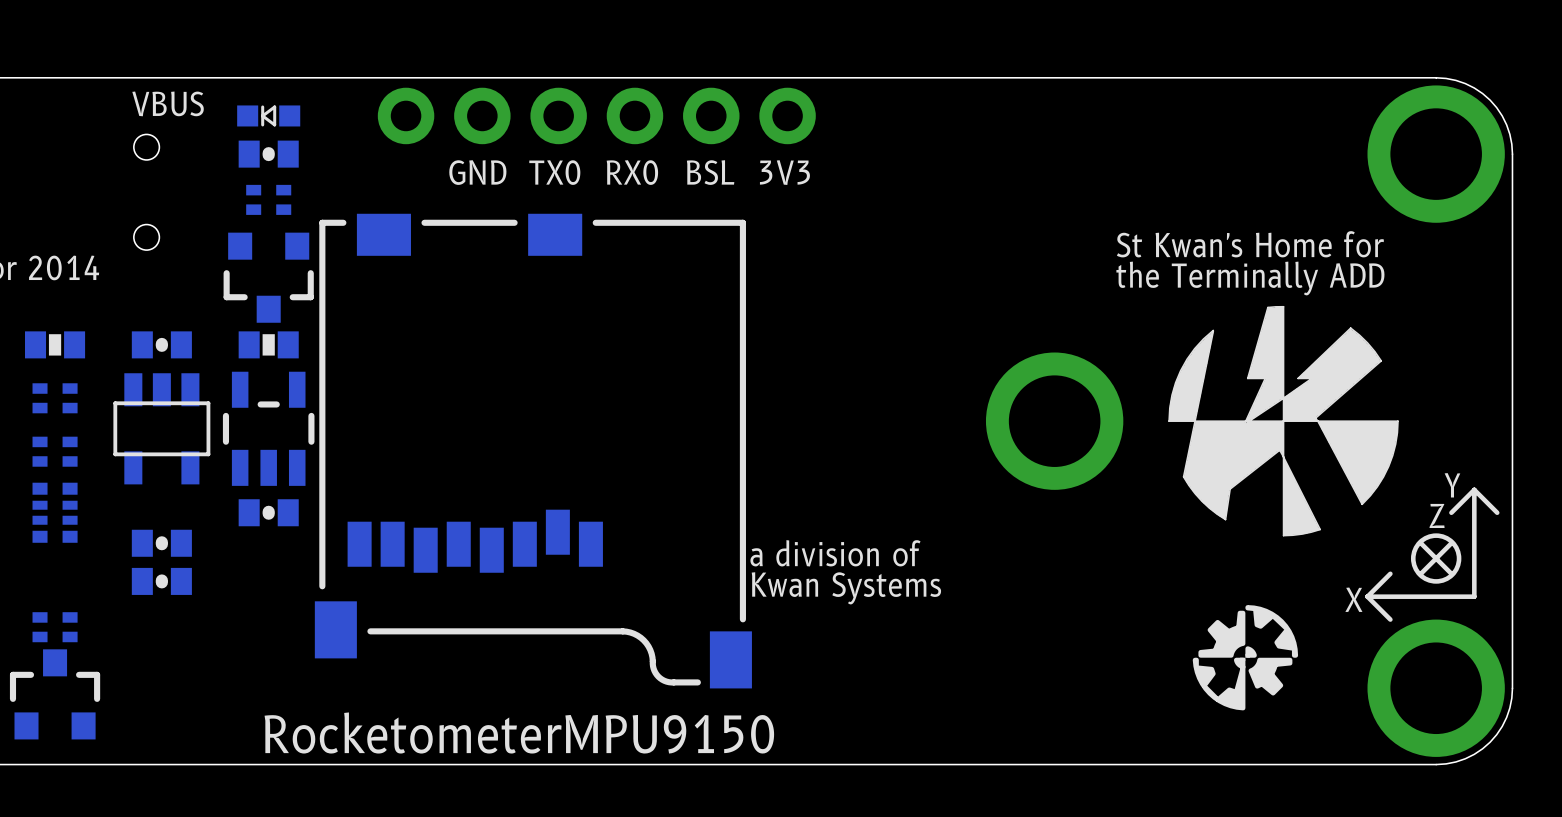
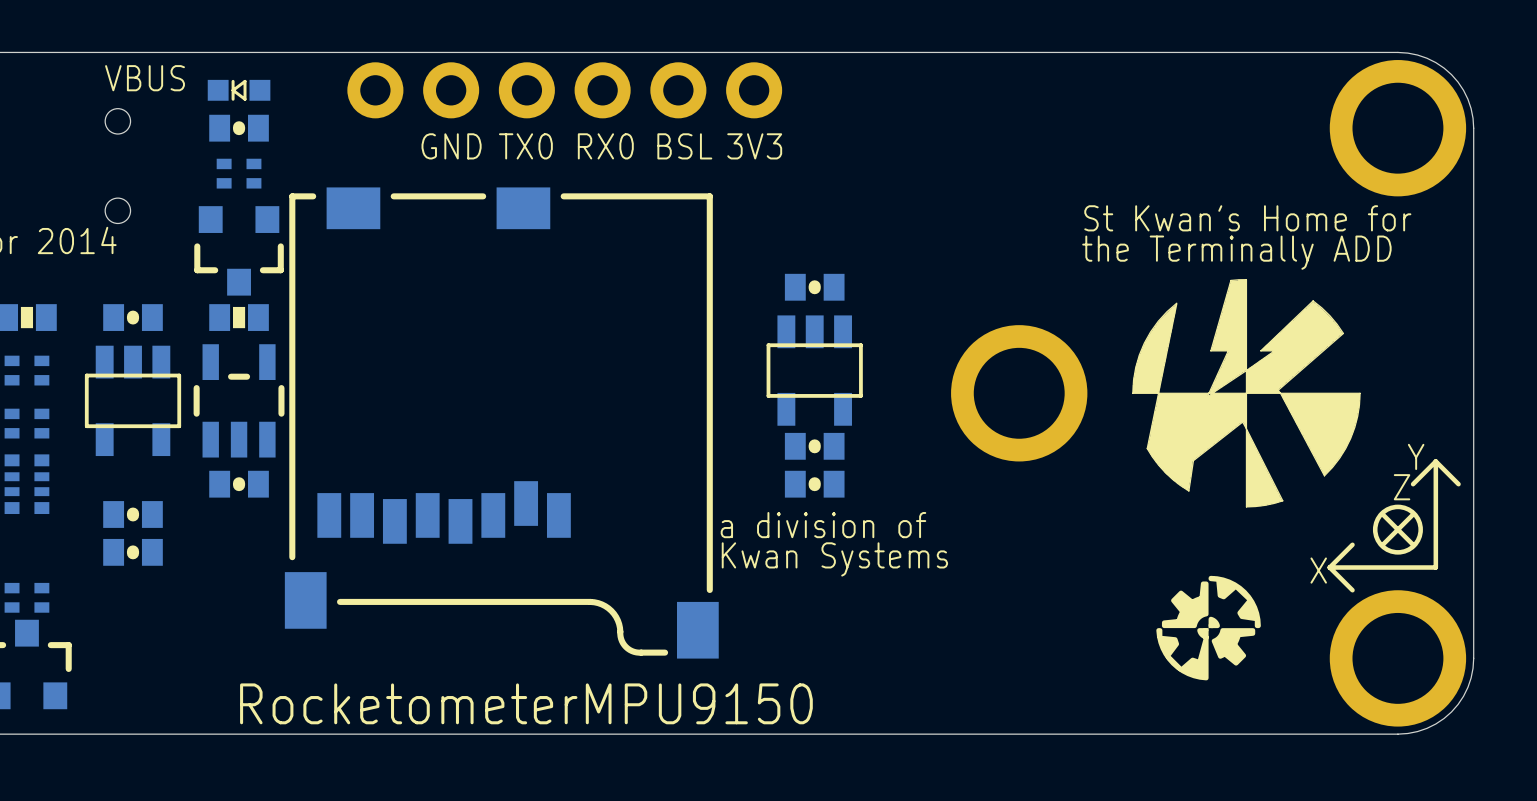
part: none -> (814, 287)
part: none -> (814, 370)
part: none -> (814, 446)
part: none -> (814, 484)

